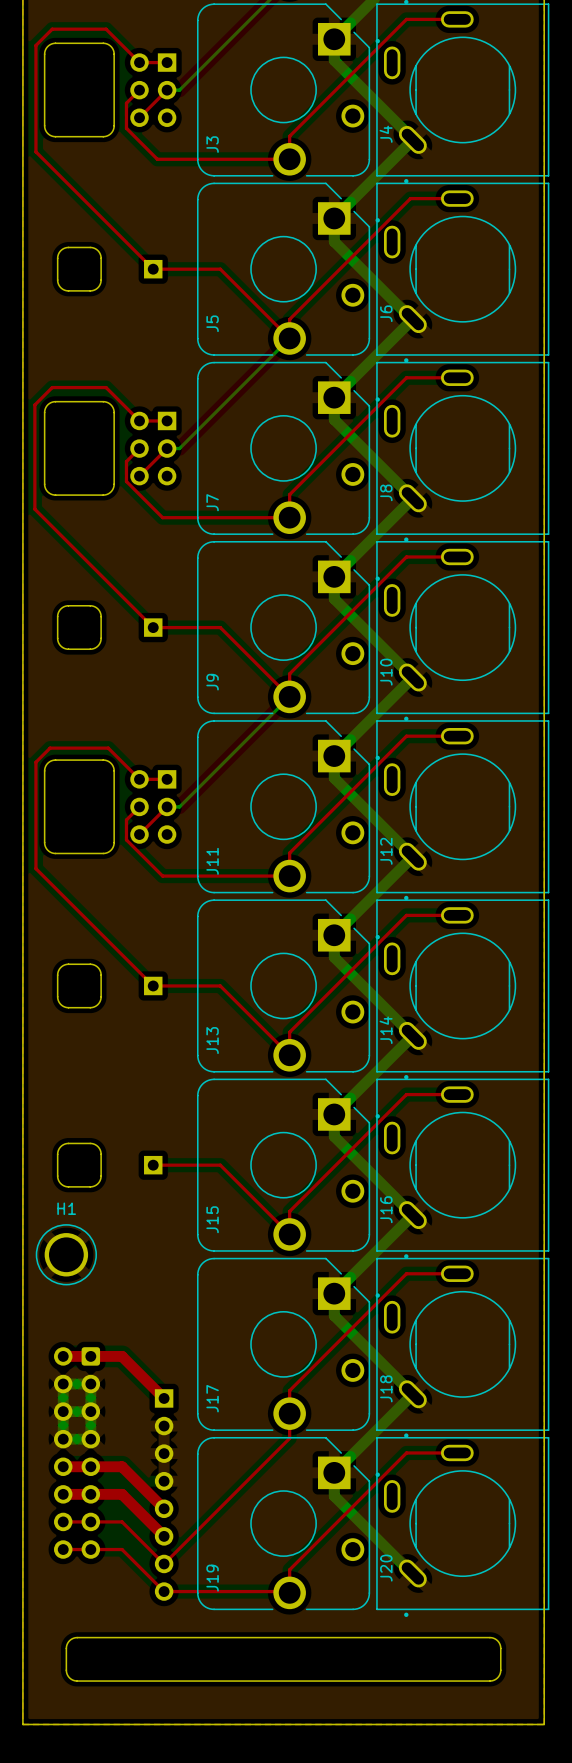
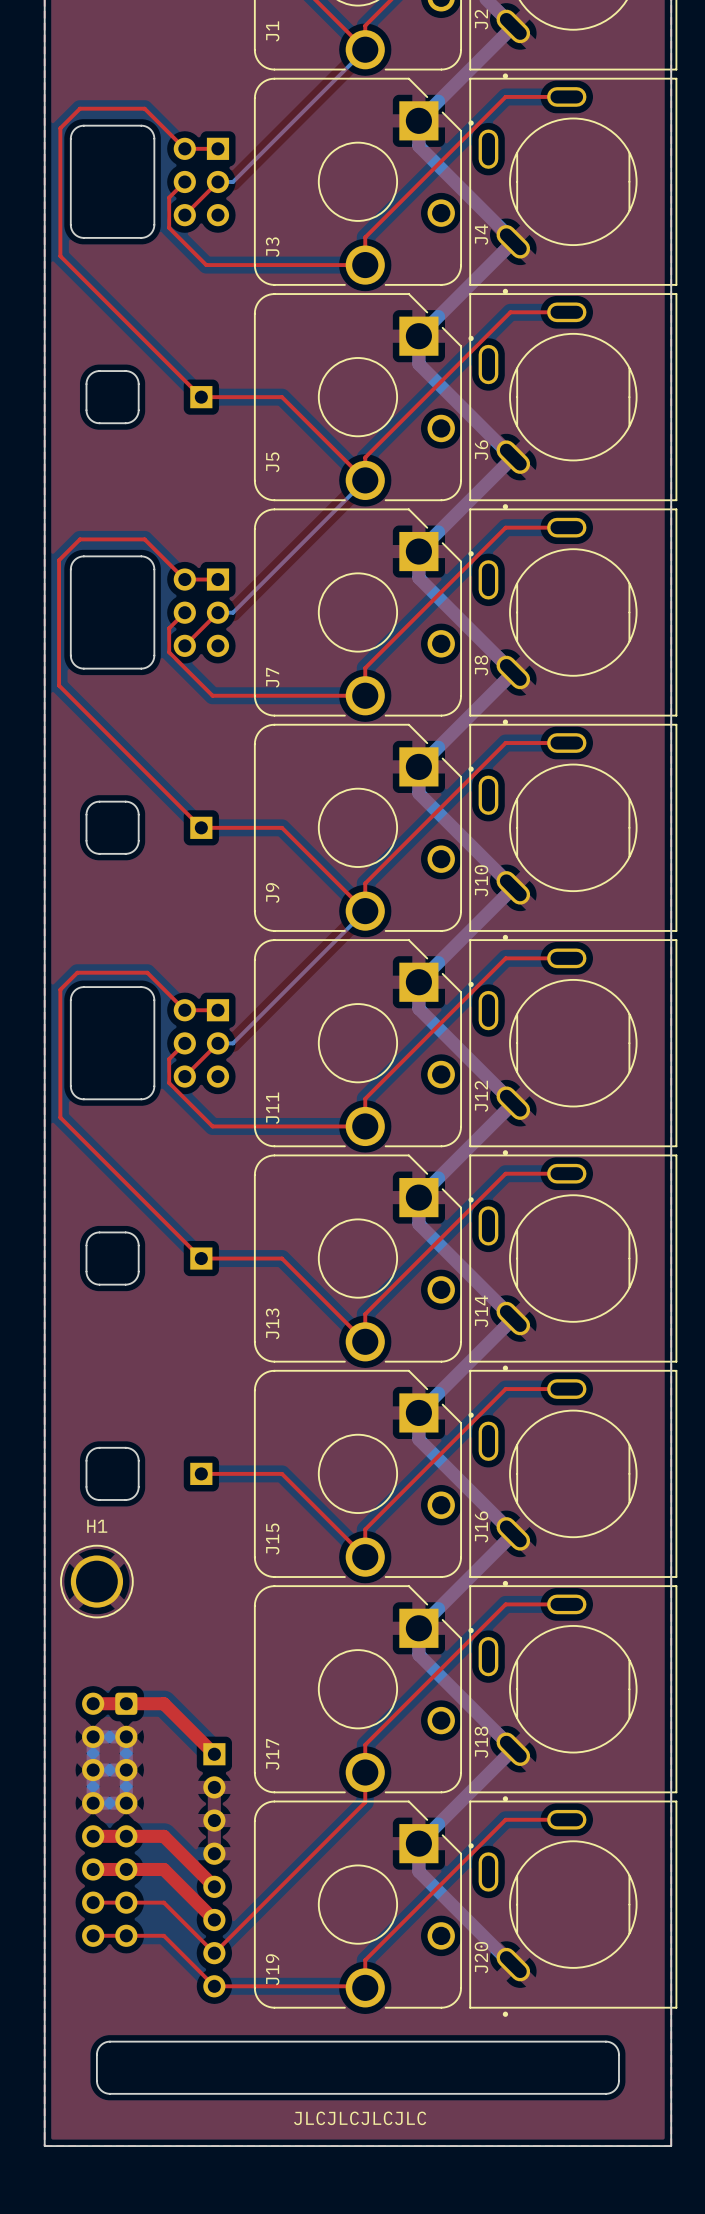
text: none -> JLCJLCJLCJLC (360, 2118)

